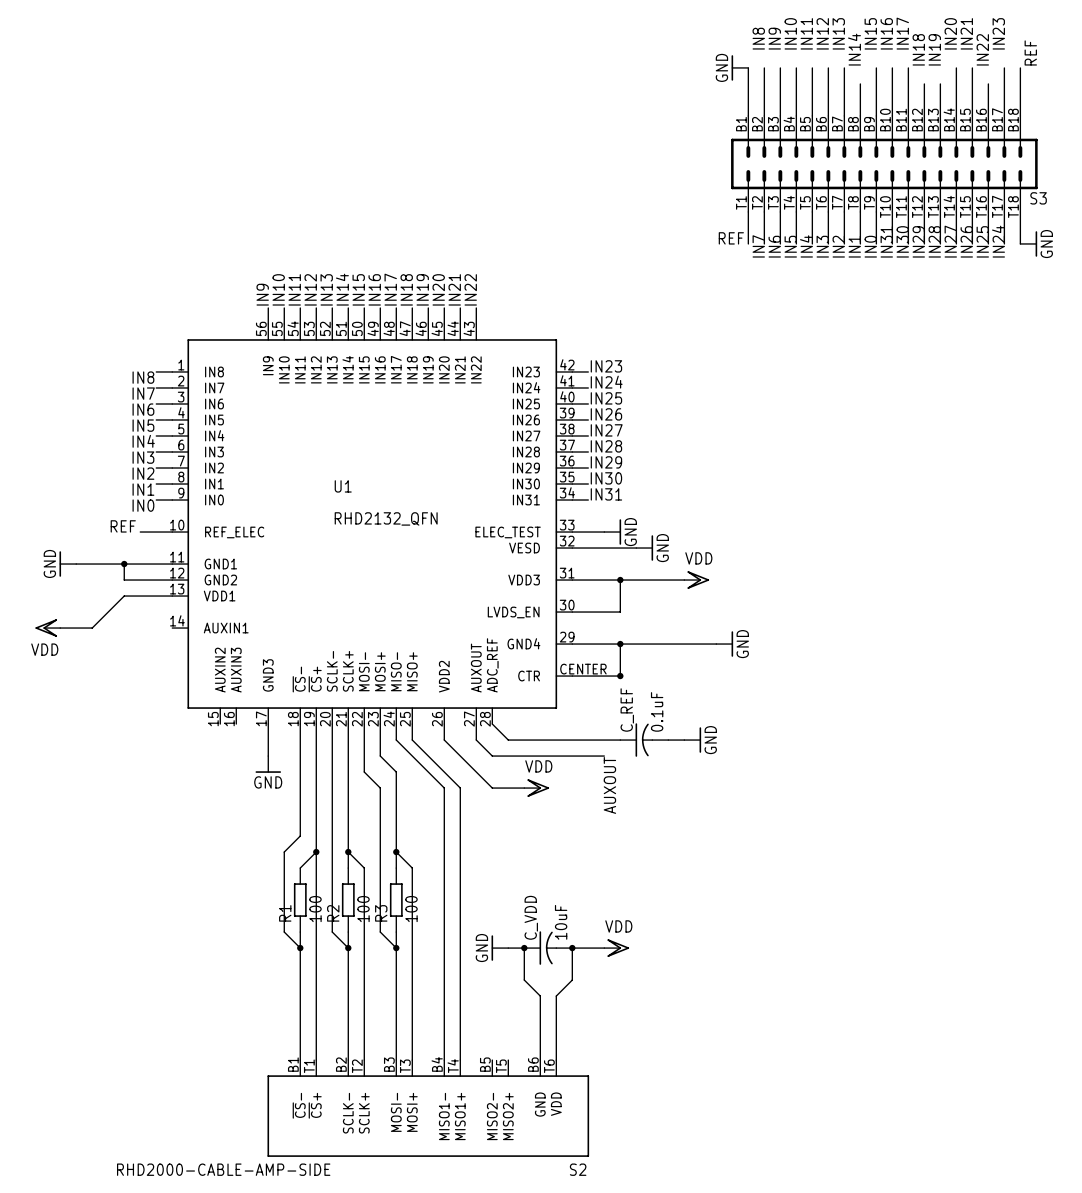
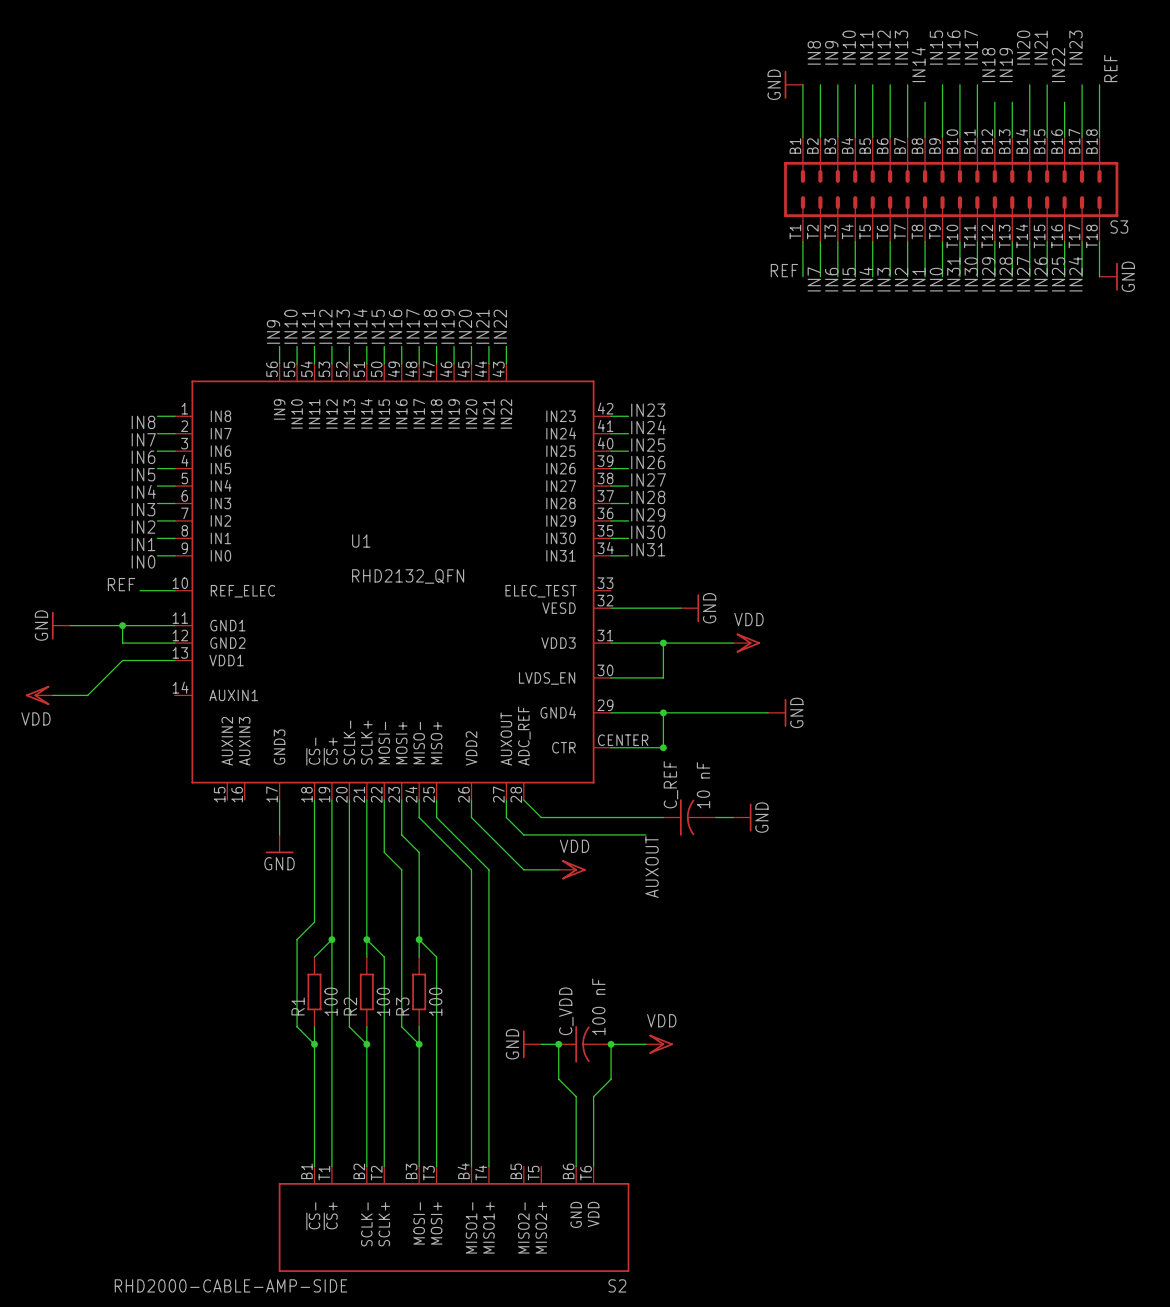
wire: (572, 532) (604, 532) -> none
power symbol: GND (612, 532) -> none
C_REF value: 0.1uF (657, 711) -> 10 nF (703, 785)
C_VDD value: 10uF (561, 922) -> 100 nF (598, 1006)

